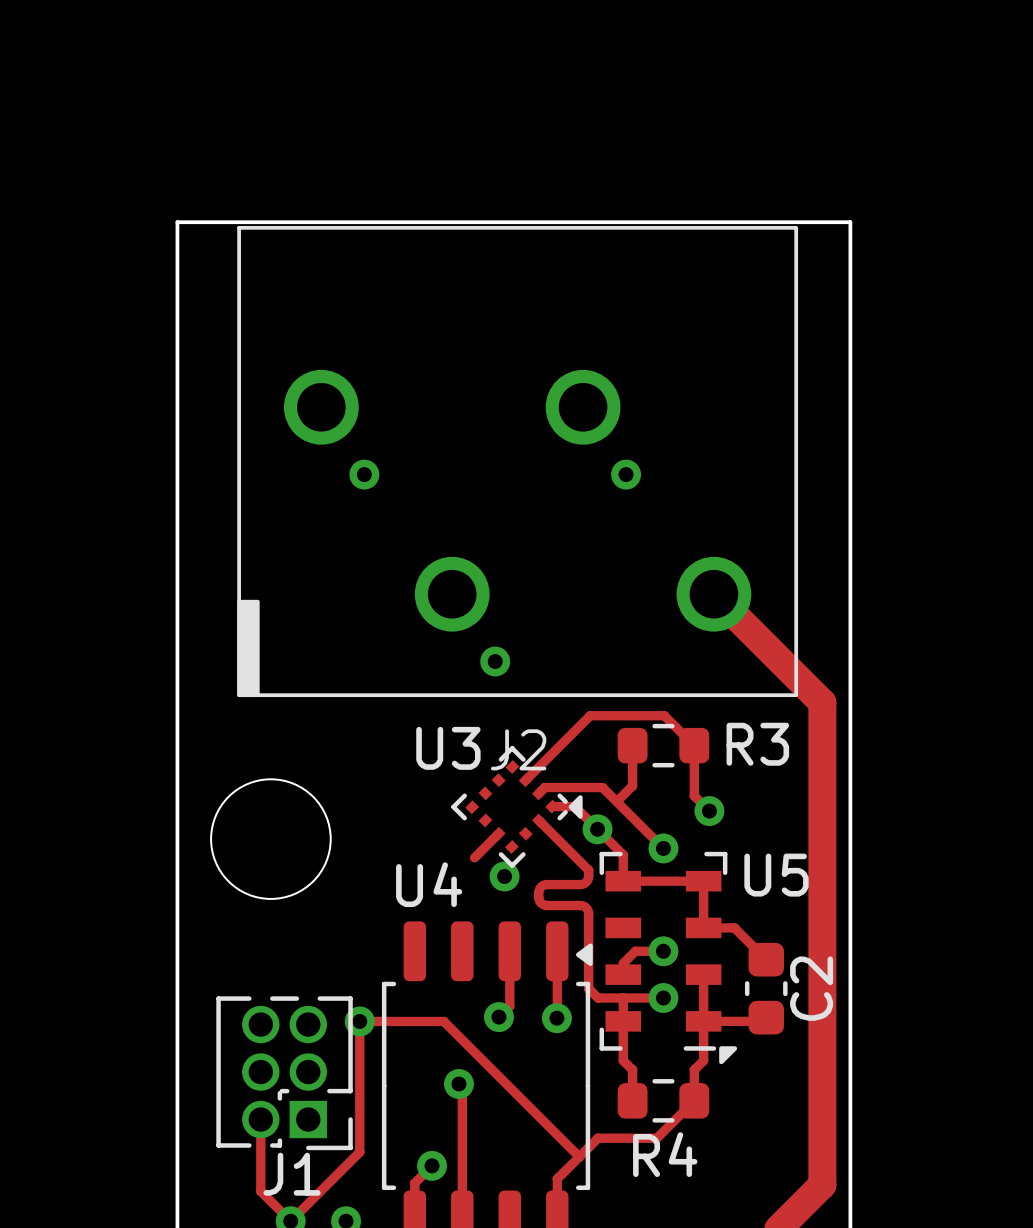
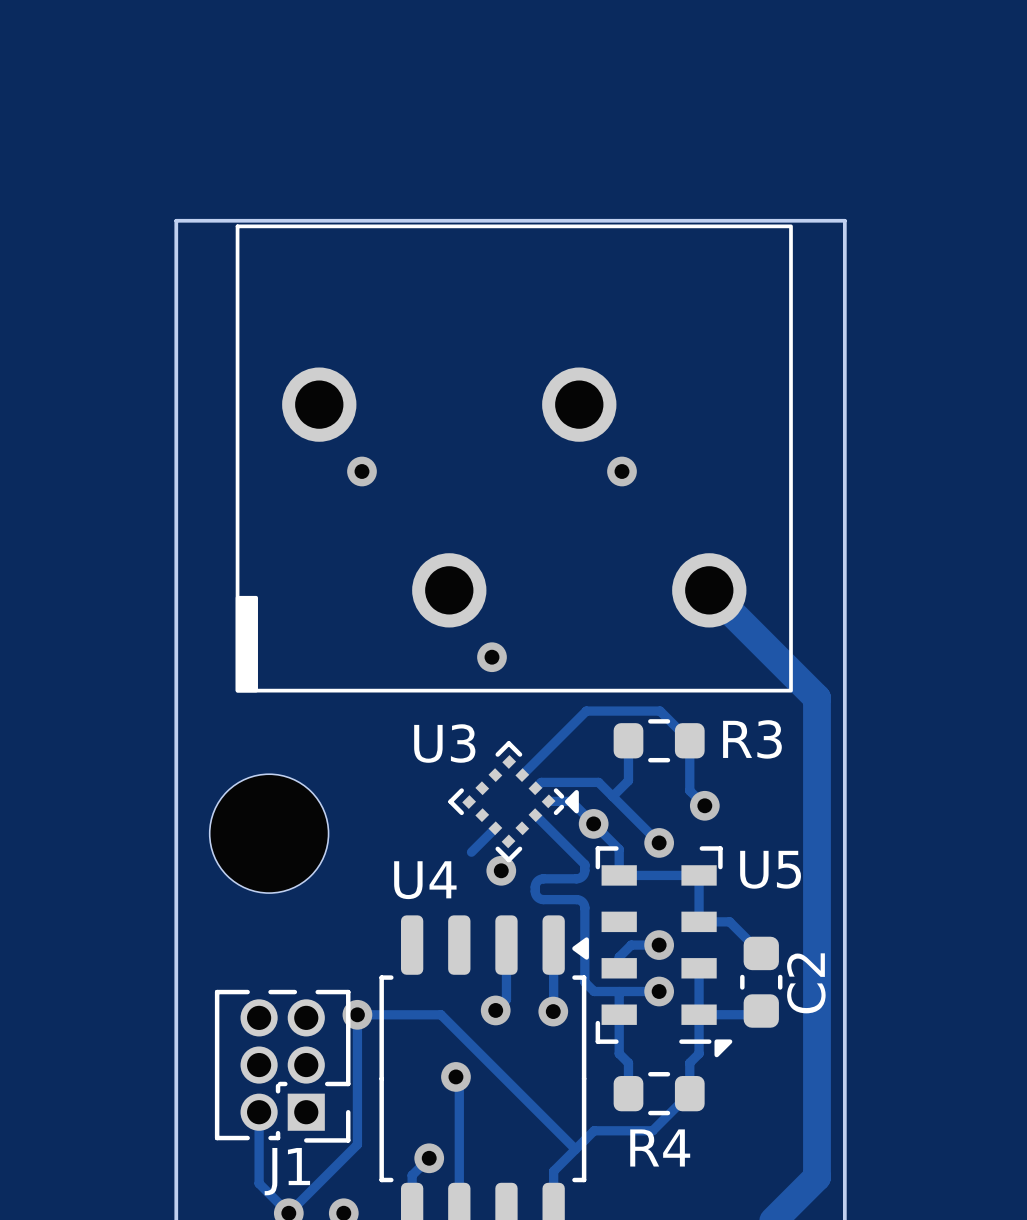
J2 name: J2 (518, 749) -> none

